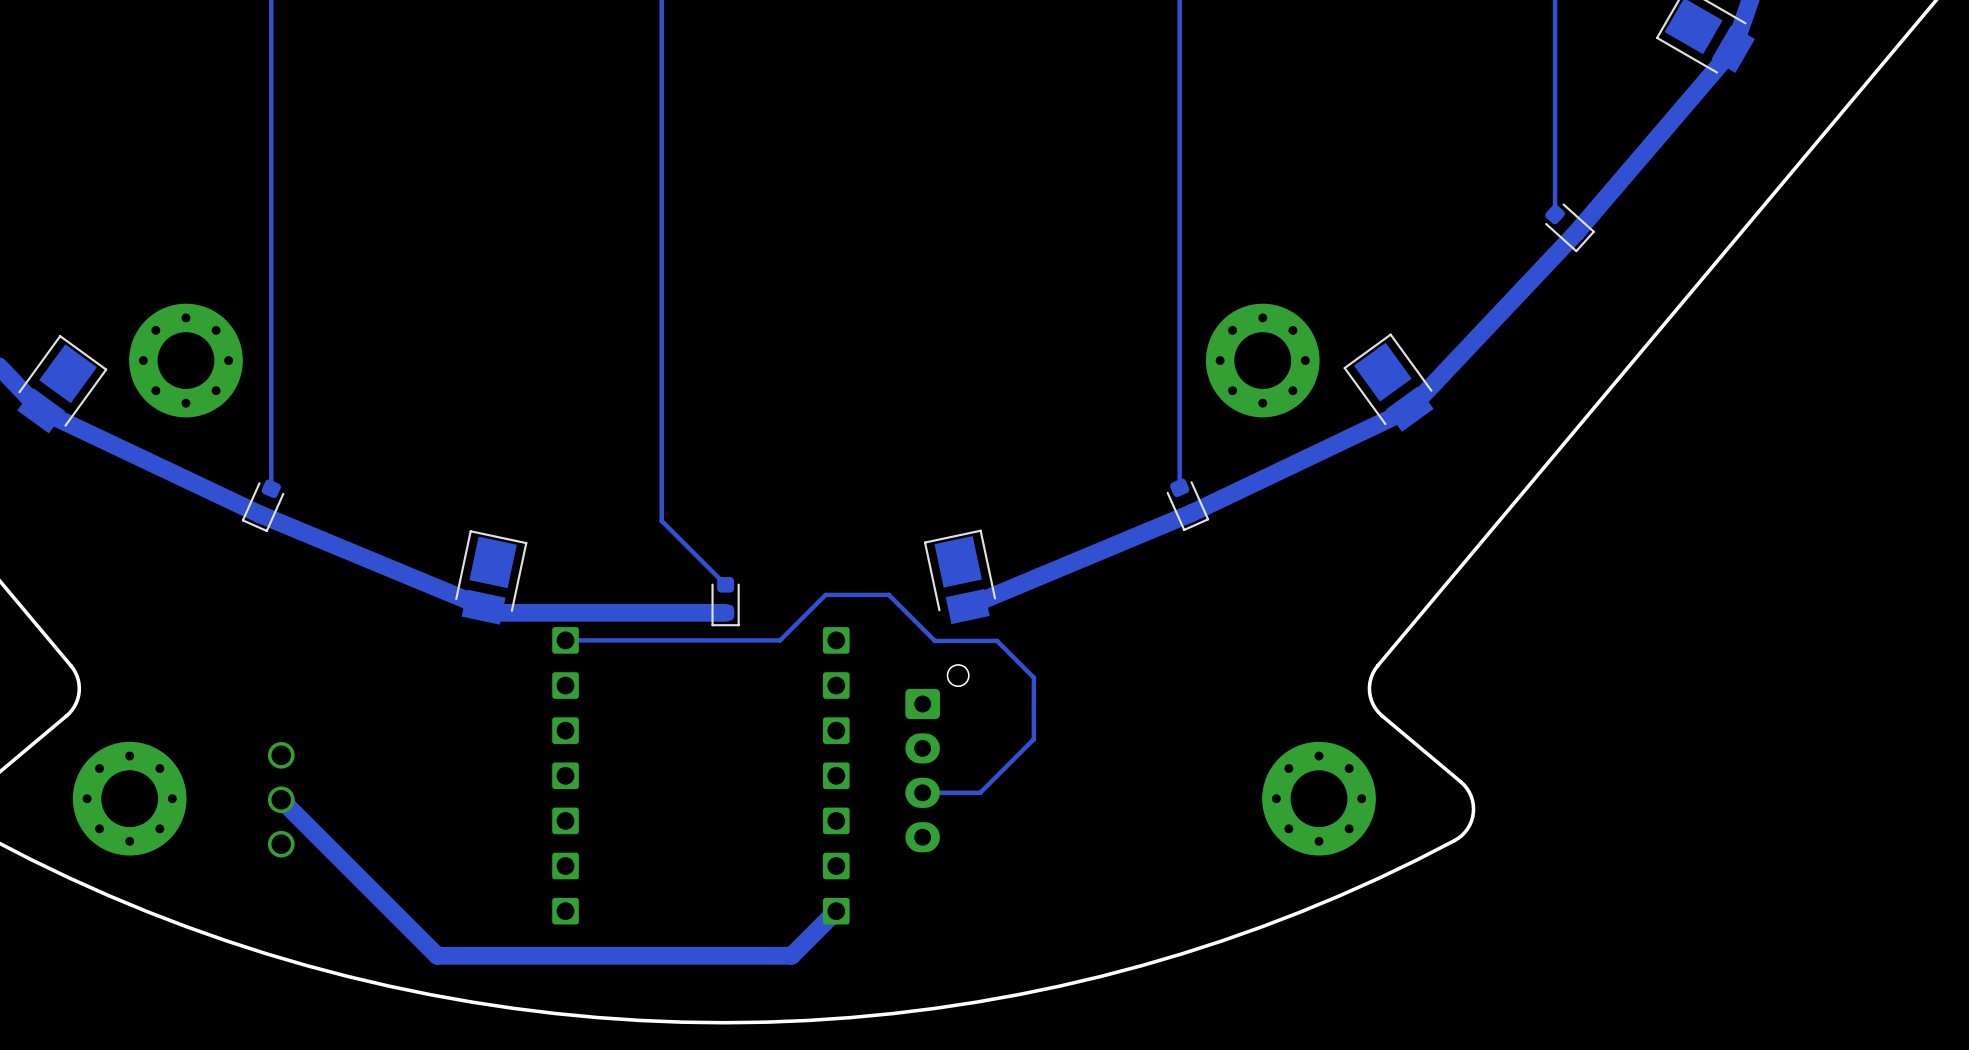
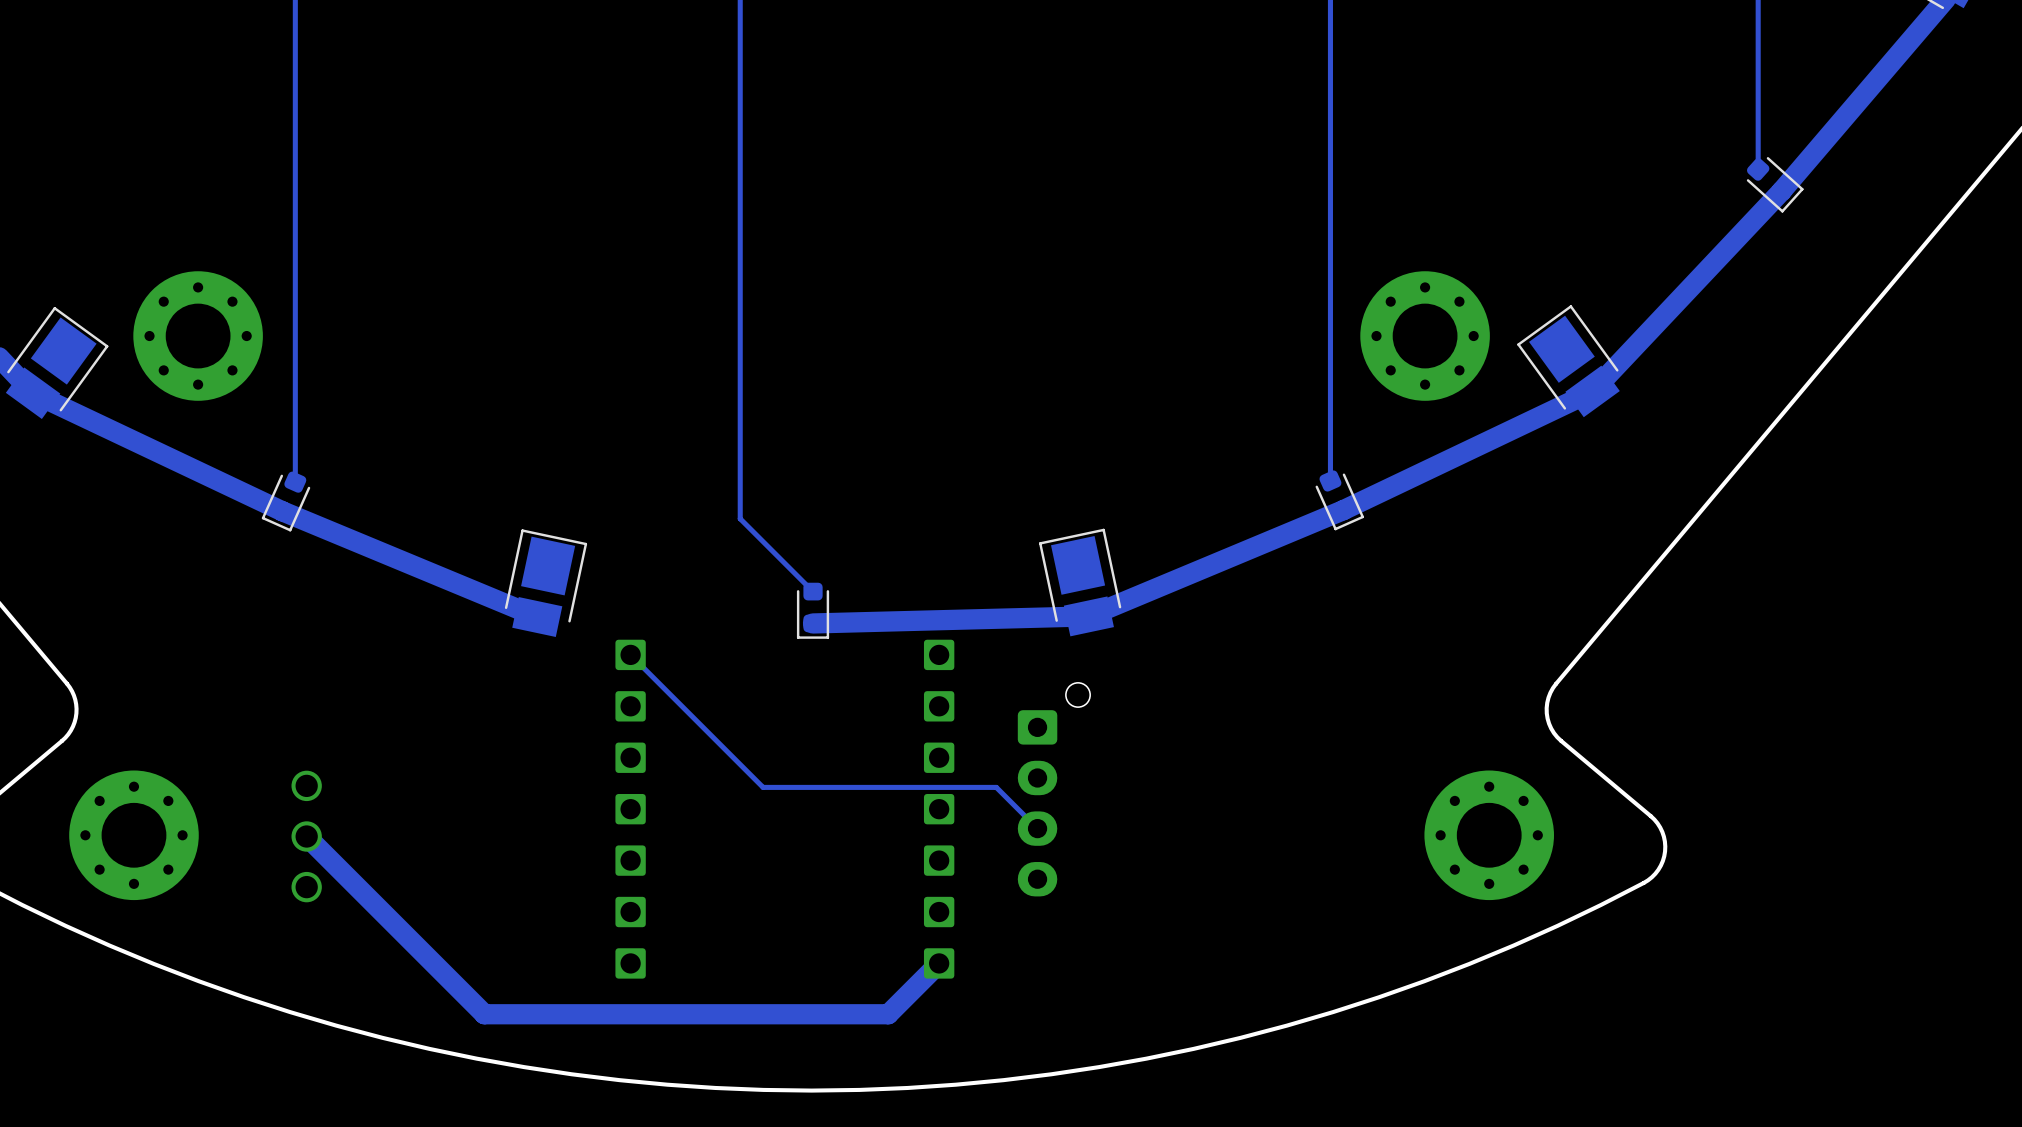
track: (483, 607) (489, 612) (725, 612) -> (1088, 616) (813, 623)
track: (565, 640) (780, 640) (825, 594) (888, 594) (934, 640) (997, 640) (1033, 677) (1033, 739) (980, 792) (922, 792) -> (630, 654) (763, 787) (996, 787) (1037, 828)

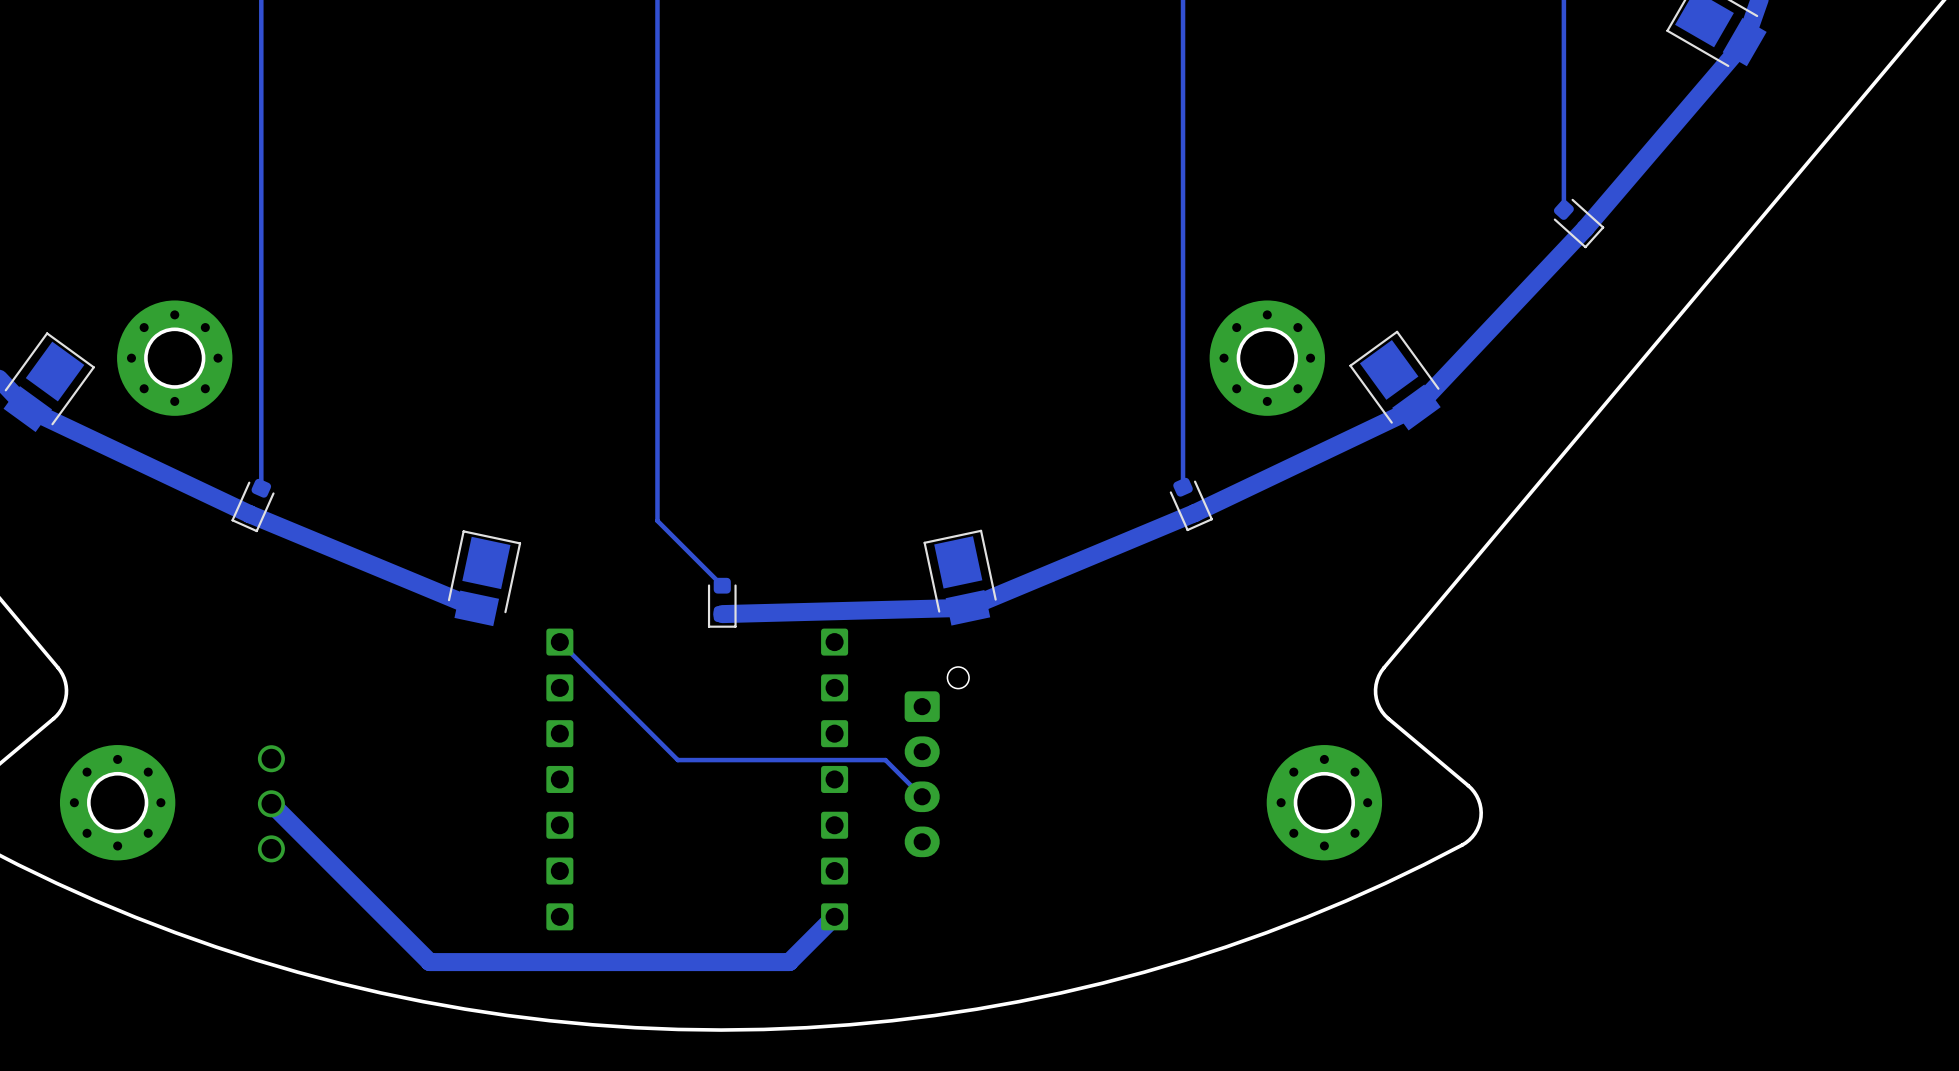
round board edge: none -> [144, 327, 206, 389]
round board edge: none -> [1236, 327, 1298, 389]
round board edge: none -> [87, 771, 149, 834]
round board edge: none -> [1293, 771, 1356, 834]

